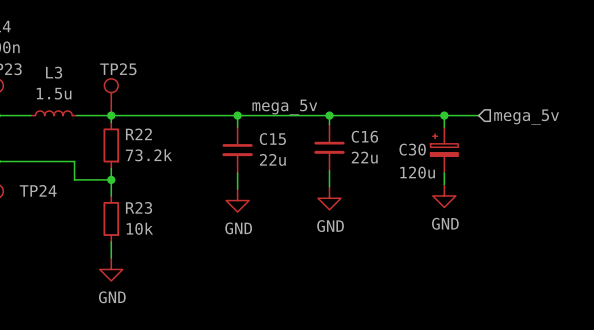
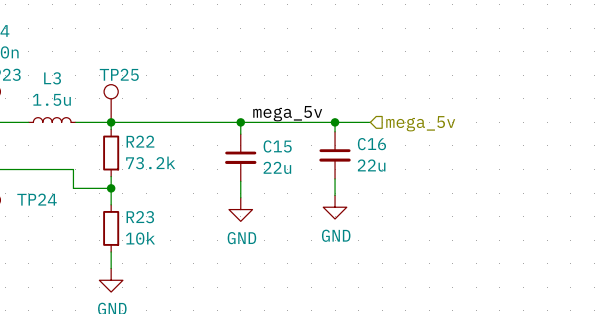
wire: (363, 115) (478, 115) -> none
wire: (444, 115) (444, 127) -> none
junction: (444, 115) -> none
hierarchical label position: mega_5v (526, 117) -> mega_5v (420, 123)
C30: 120u (444, 150) -> none
wire: (444, 173) (444, 184) -> none
power symbol: GND (444, 195) -> none

